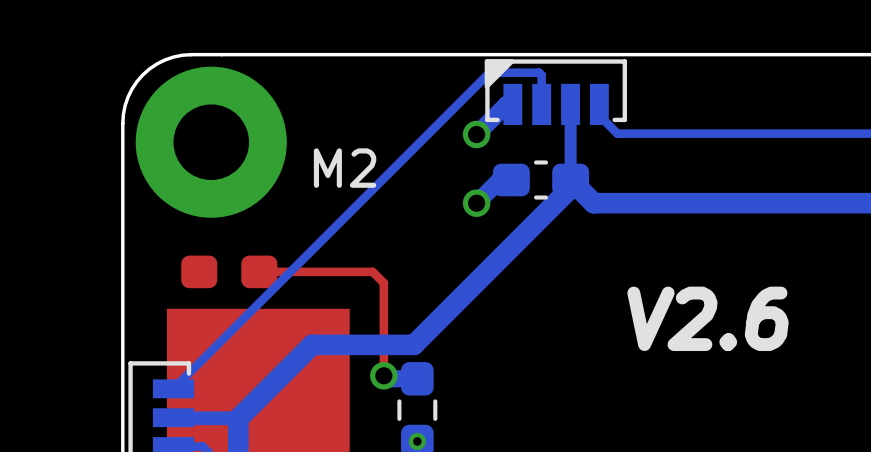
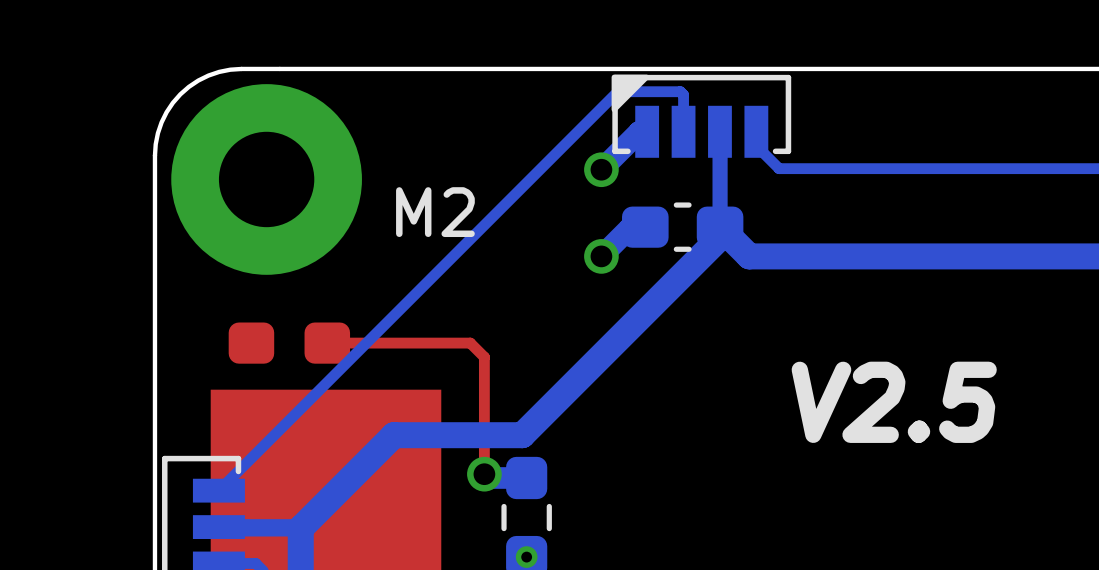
text: V2.6 (708, 318) -> V2.5 (894, 402)

